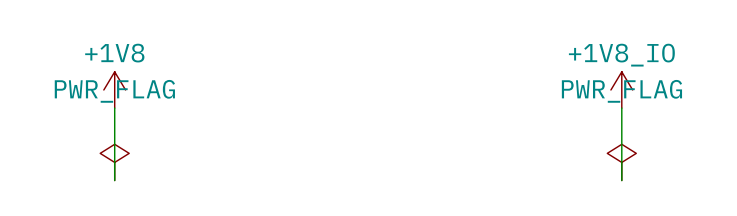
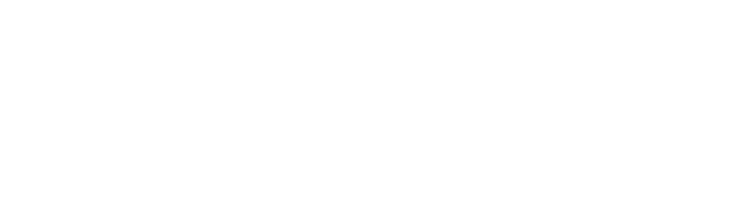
power symbol: +1V8 (114, 89) -> none
power symbol: +1V8_IO (621, 89) -> none
wire: (114, 108) (114, 180) -> none
wire: (621, 108) (621, 180) -> none
power symbol: PWR_FLAG (114, 162) -> none
power symbol: PWR_FLAG (621, 162) -> none

